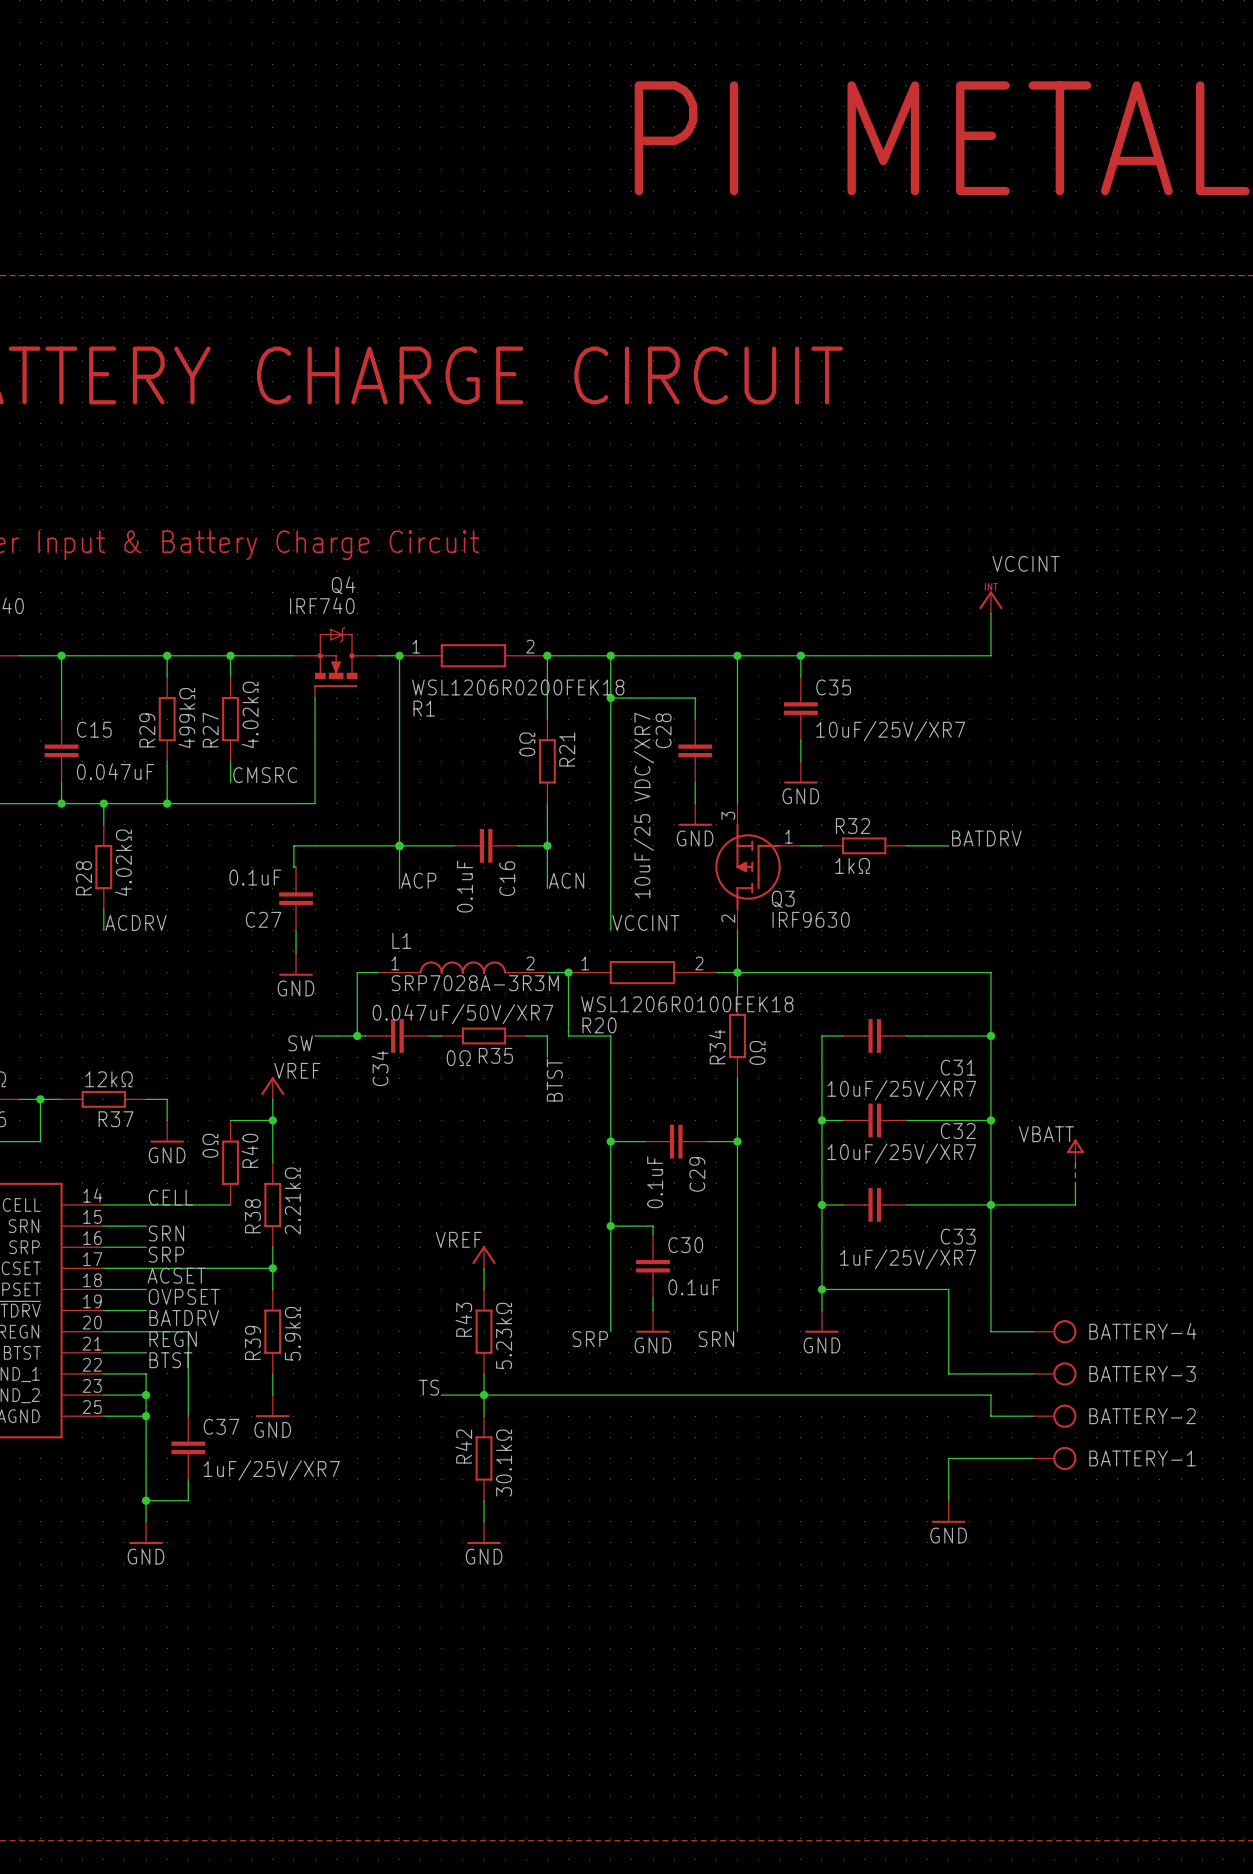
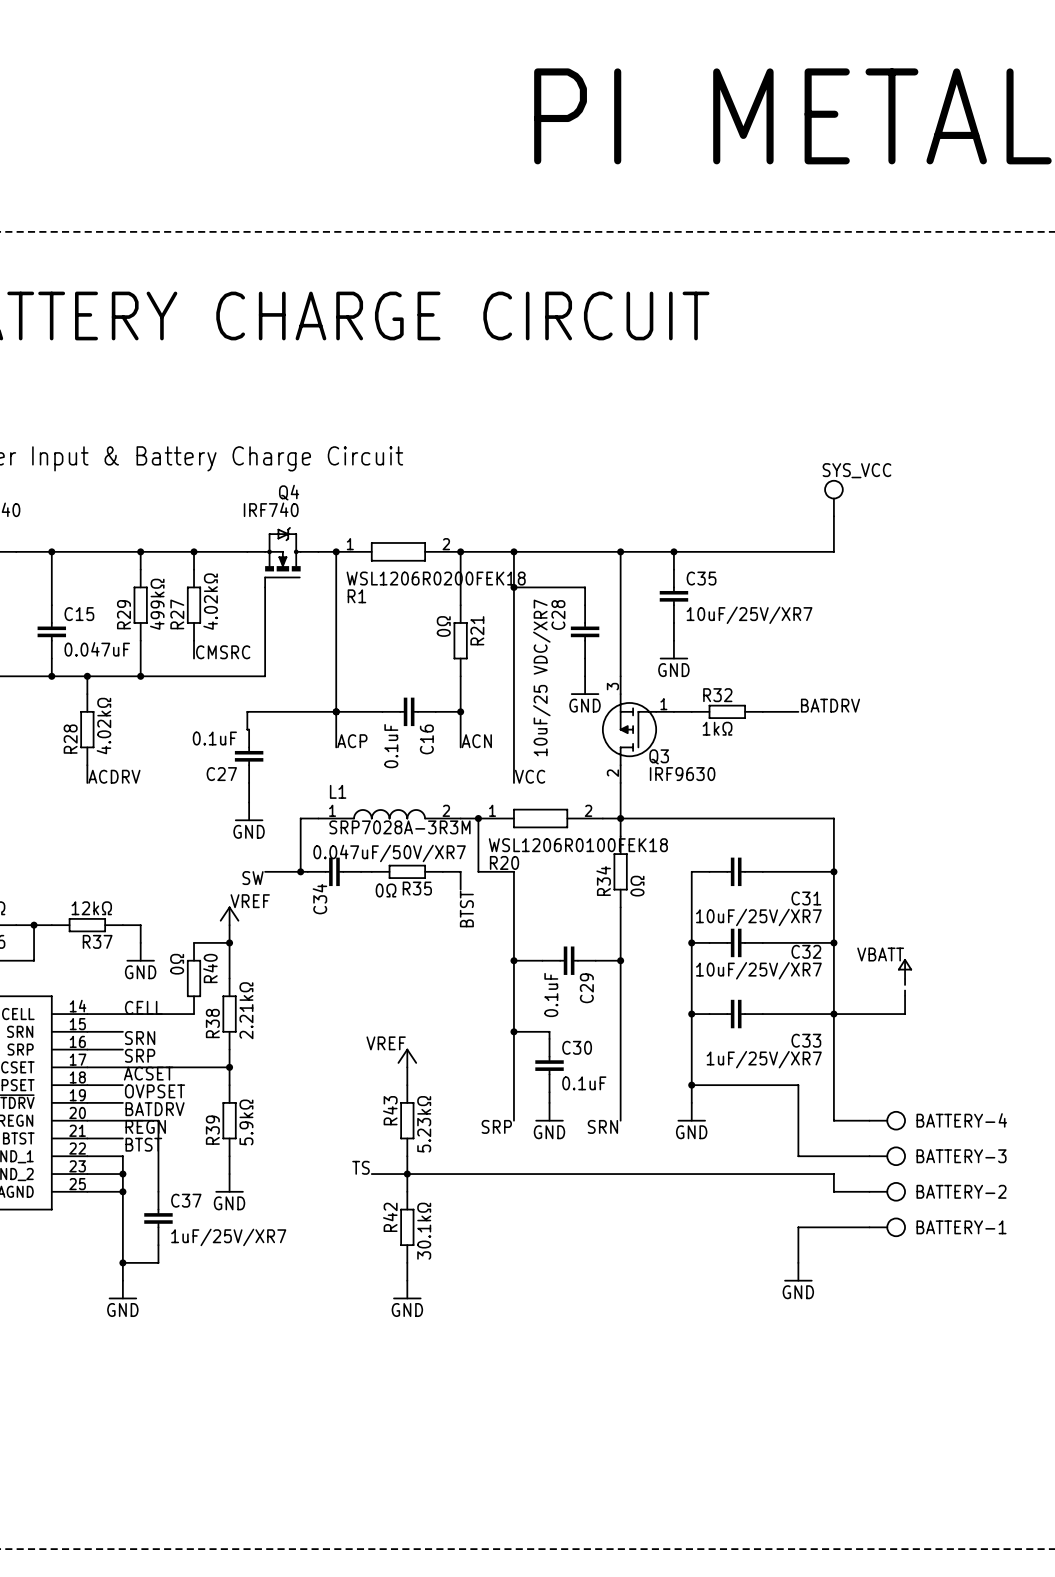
power symbol: none -> SYS_VCC (833, 498)
power symbol: VCCINT (990, 602) -> none
label: VCCINT (645, 922) -> VCC (530, 776)

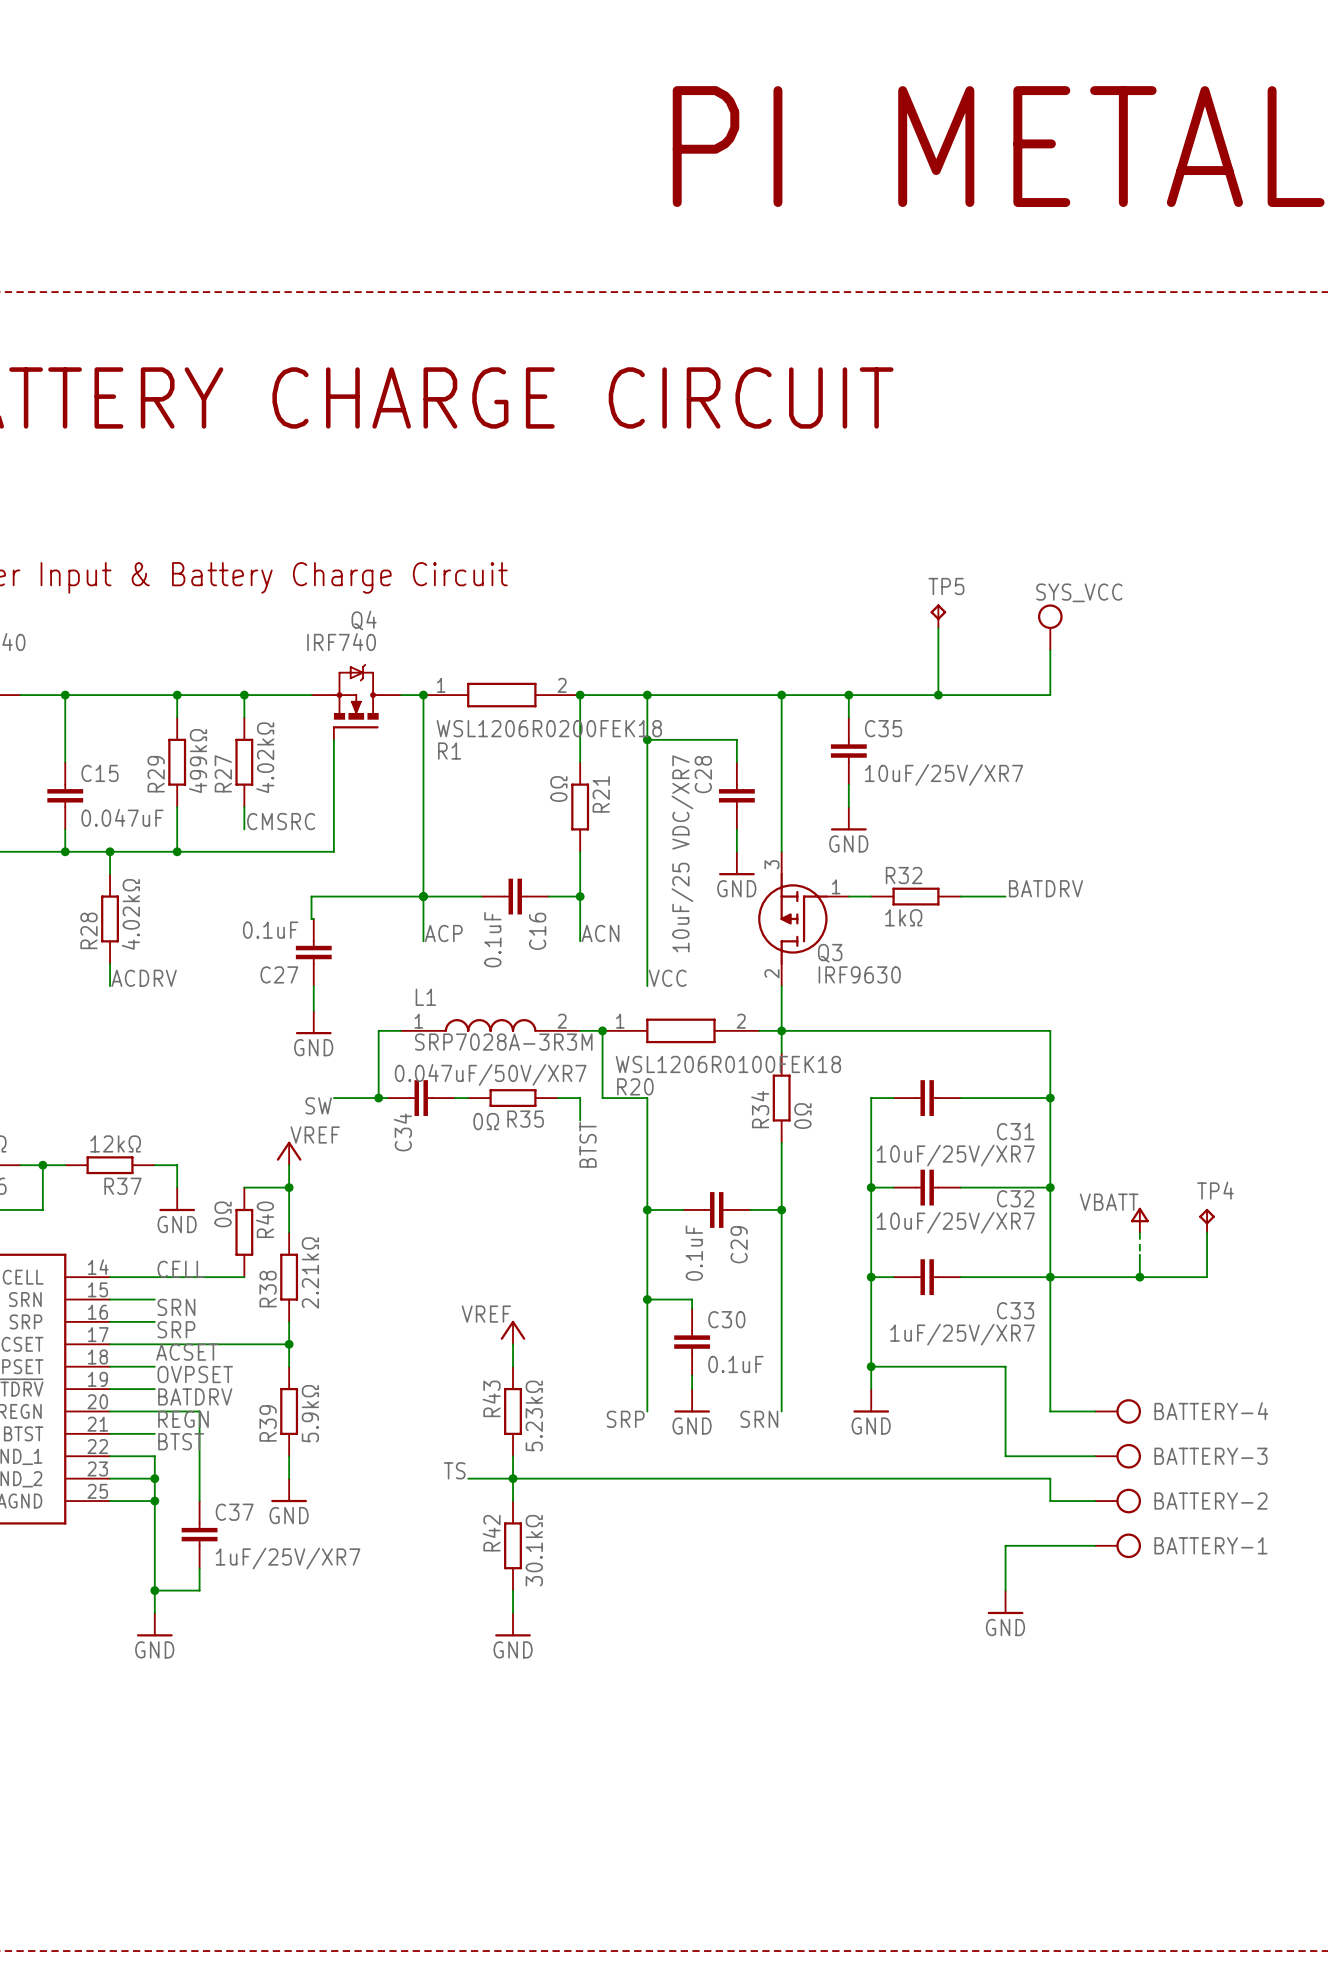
TP5: none -> (938, 616)
wire: none -> (938, 627) (938, 695)
junction: none -> (938, 695)
TP4: none -> (1207, 1220)
wire: none -> (1207, 1232) (1207, 1277) (1139, 1277)
junction: none -> (1139, 1277)

